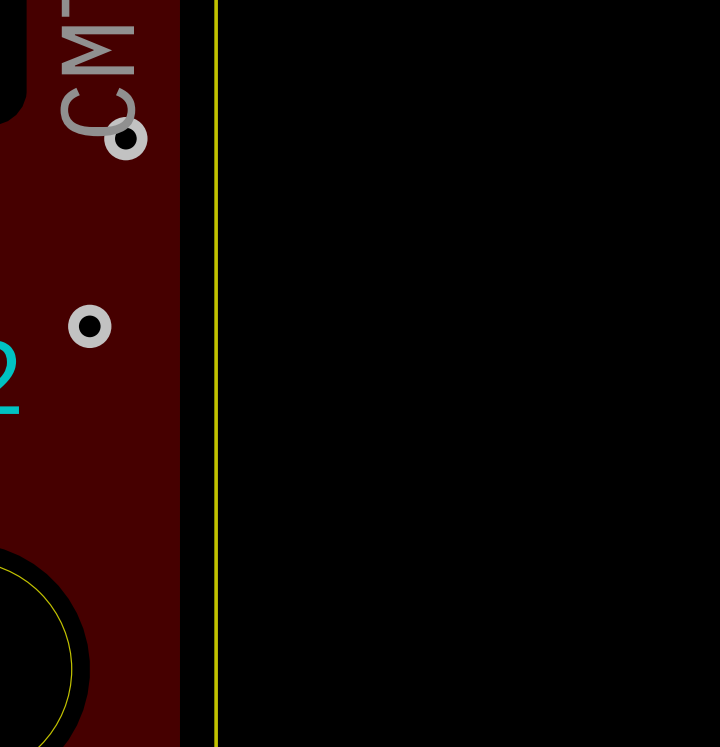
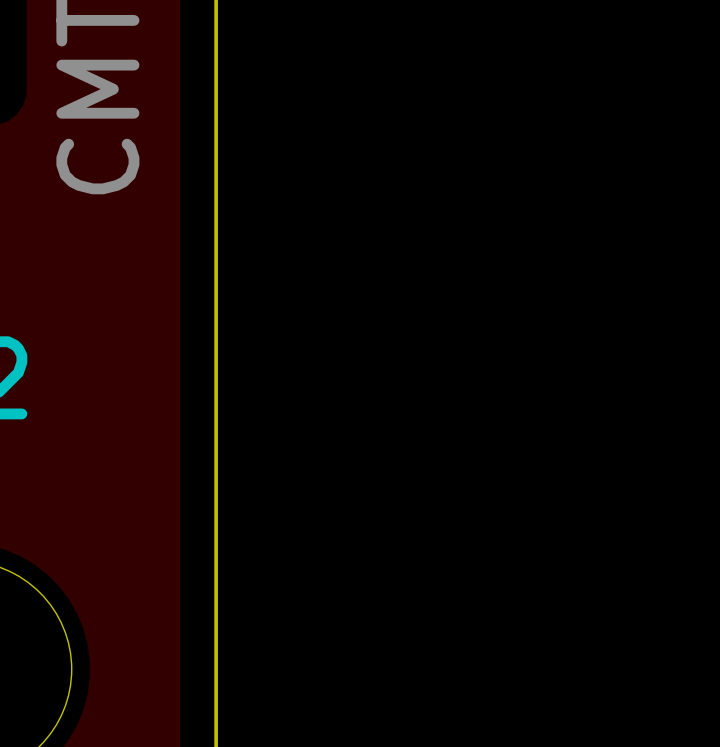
via: (125, 138) -> none
via: (89, 326) -> none

